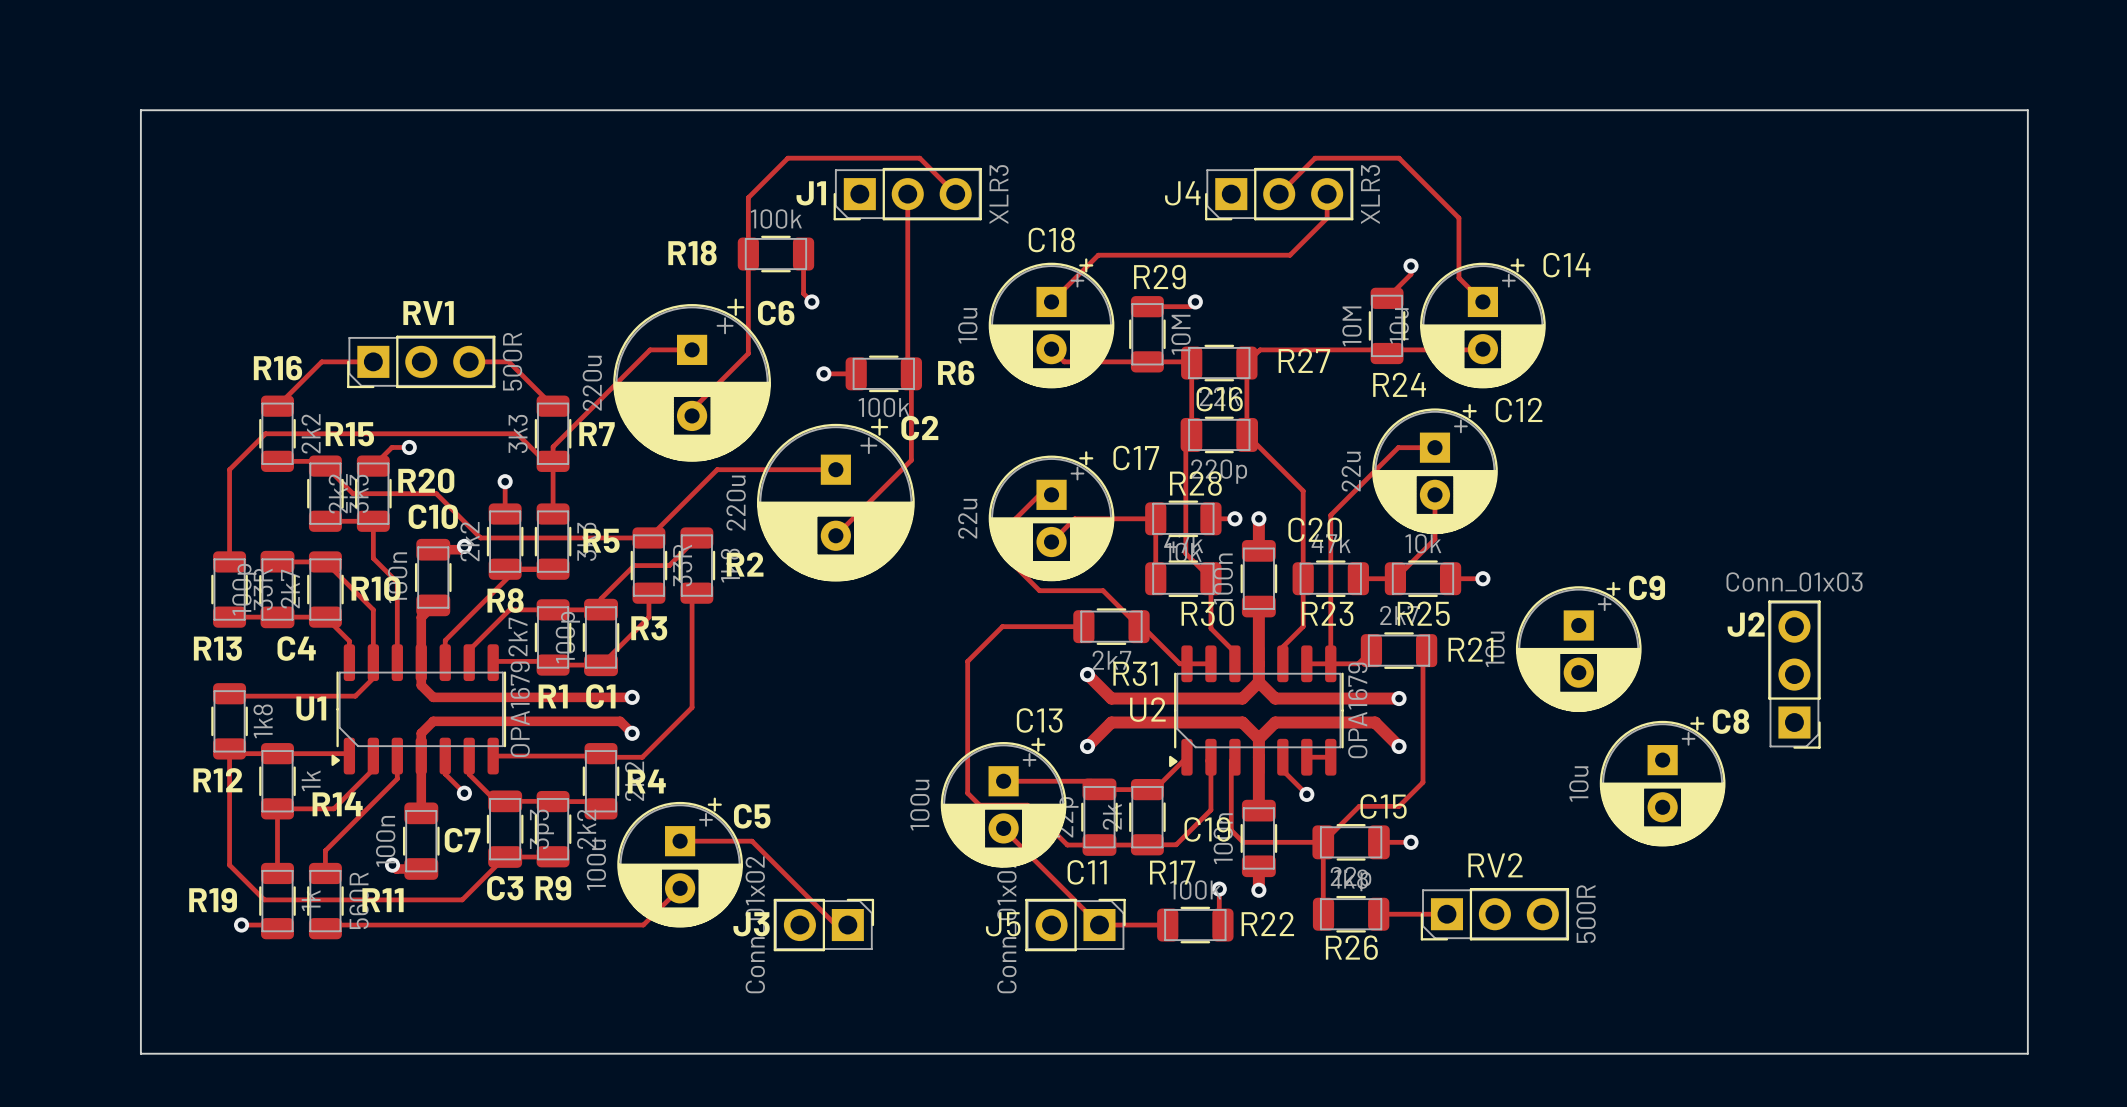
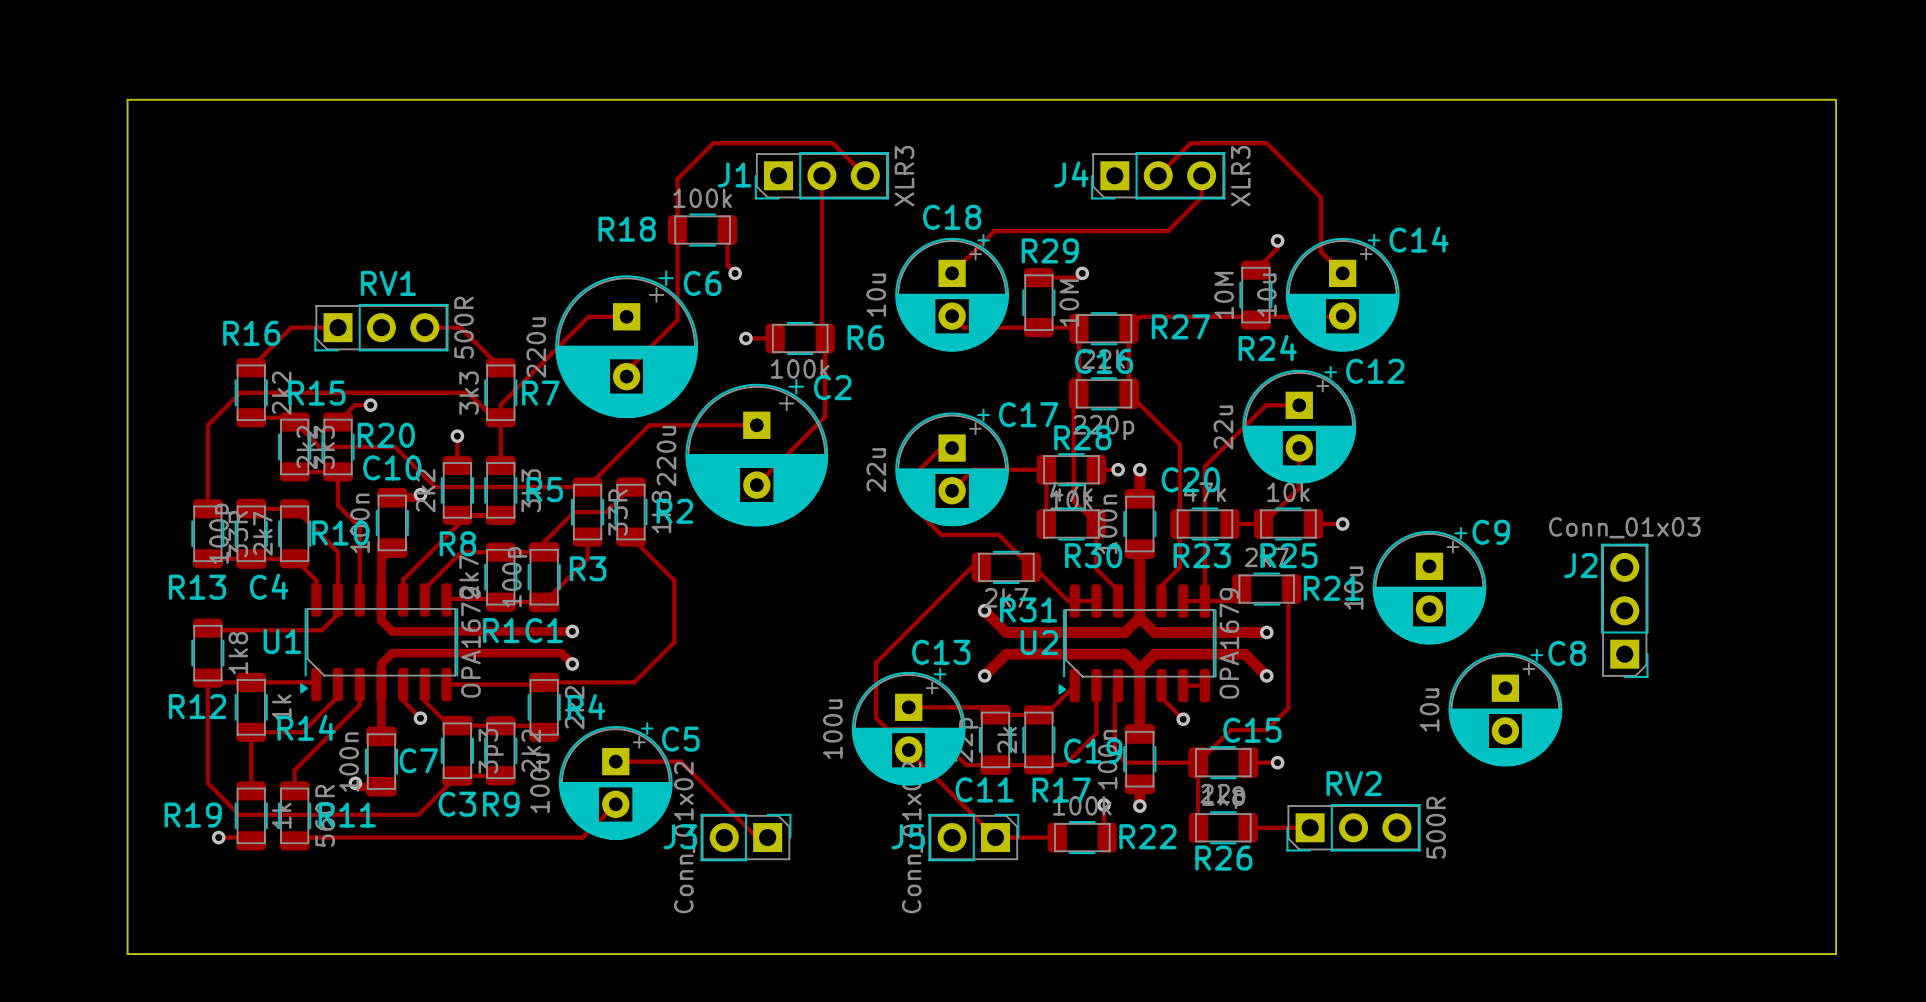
track: (696, 593) (692, 597) (692, 707) (642, 757) (604, 757) (601, 753) -> (630, 537) (674, 580) (674, 642) (634, 682) (544, 682)
track: (1073, 626) (1002, 626) (967, 661) (967, 732) -> (971, 567) (876, 662)

